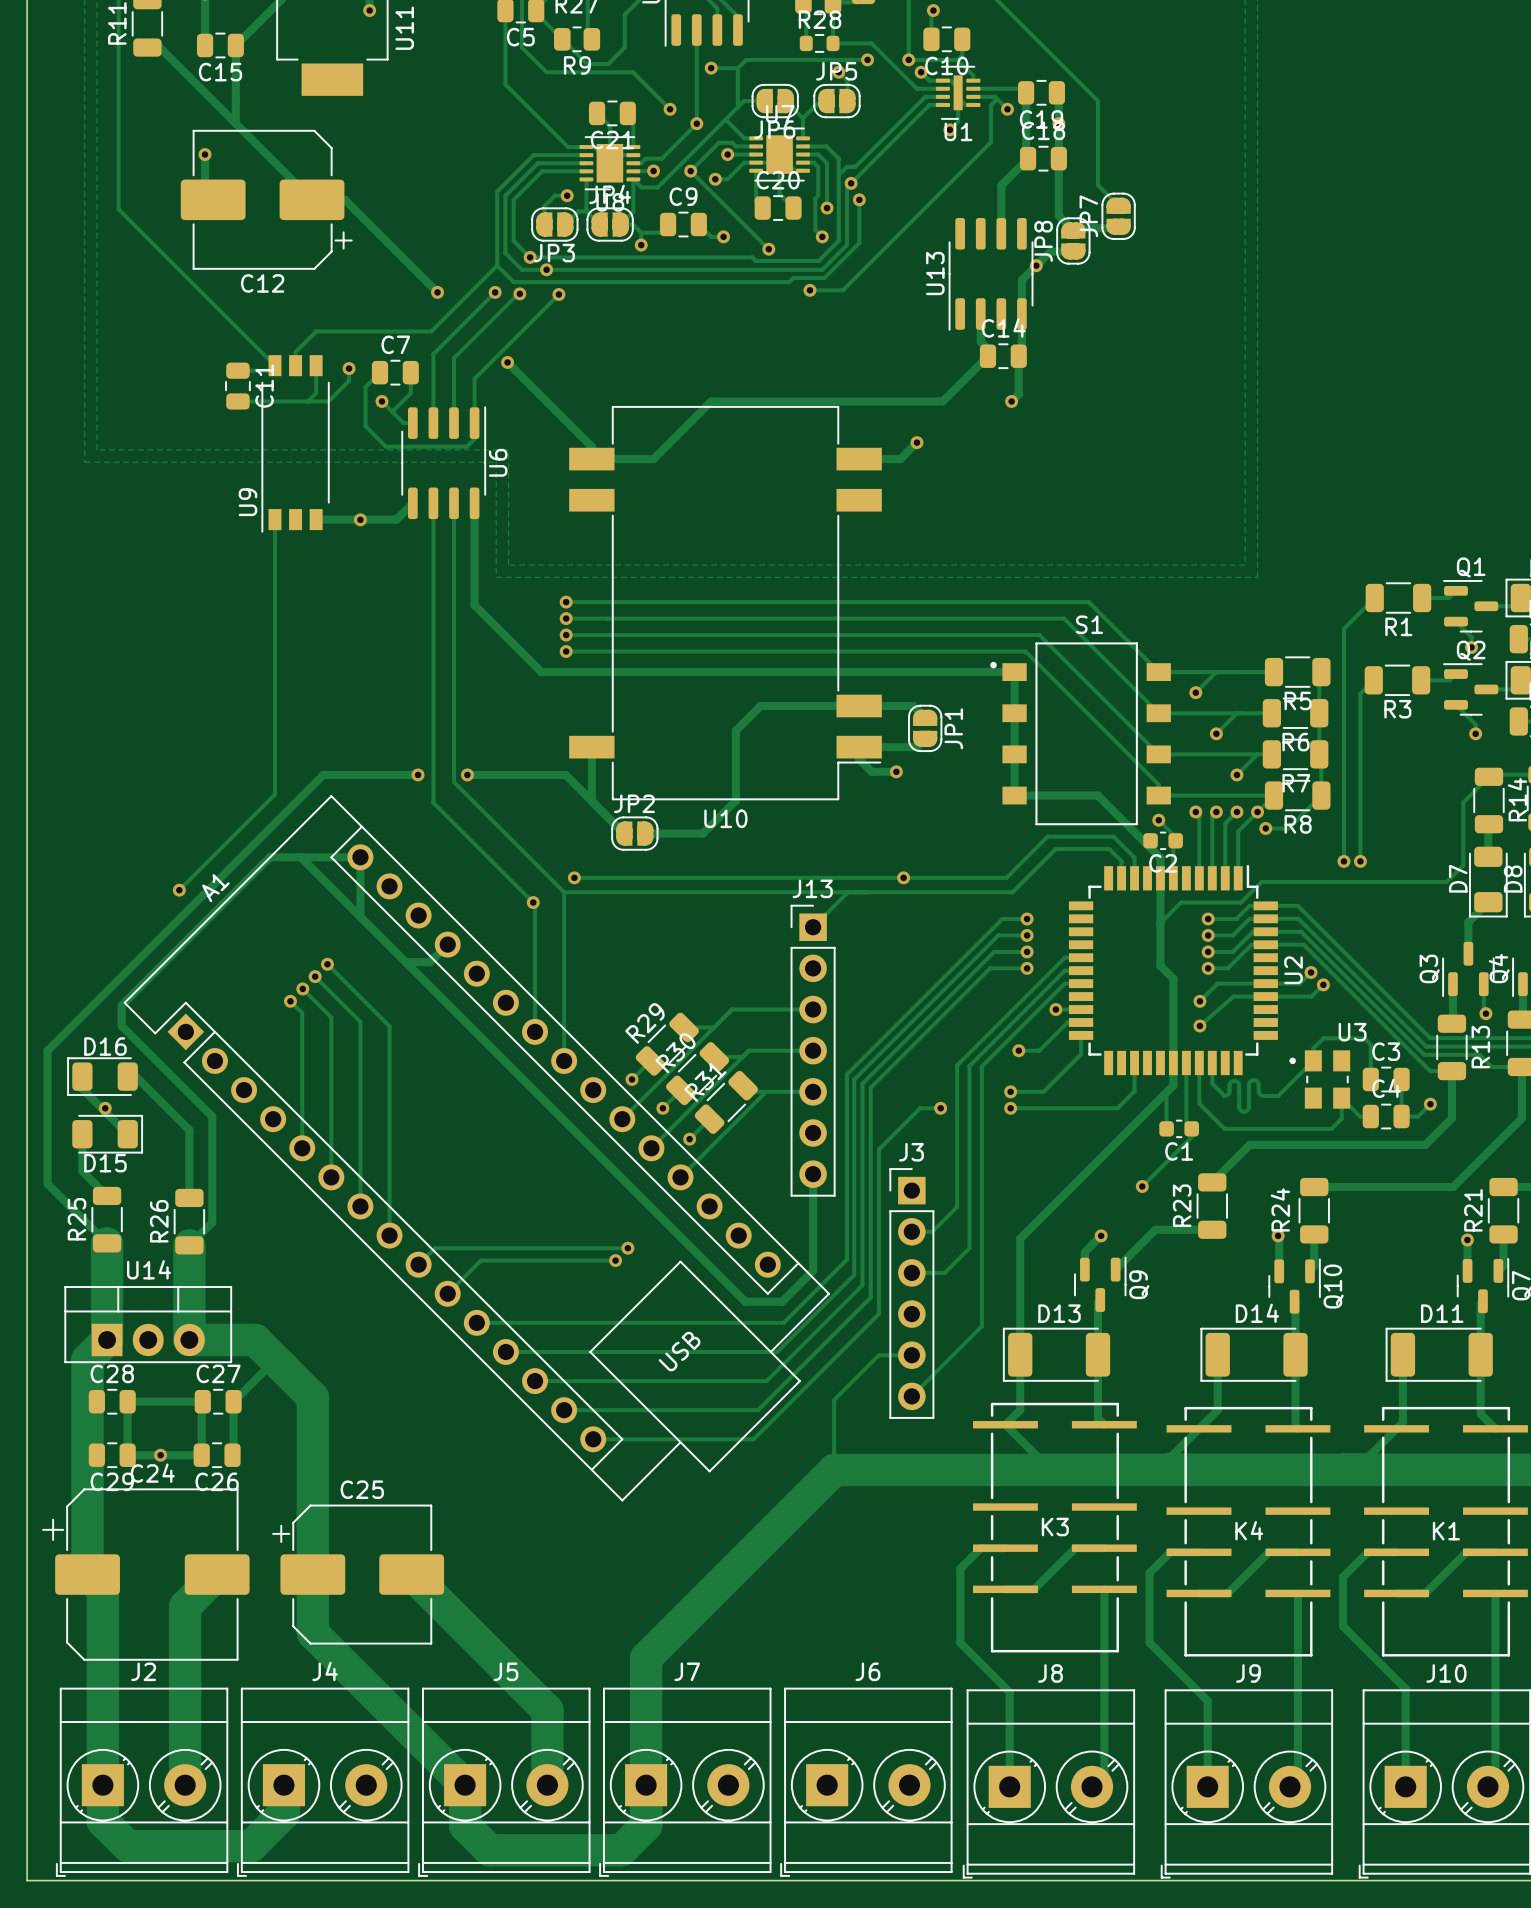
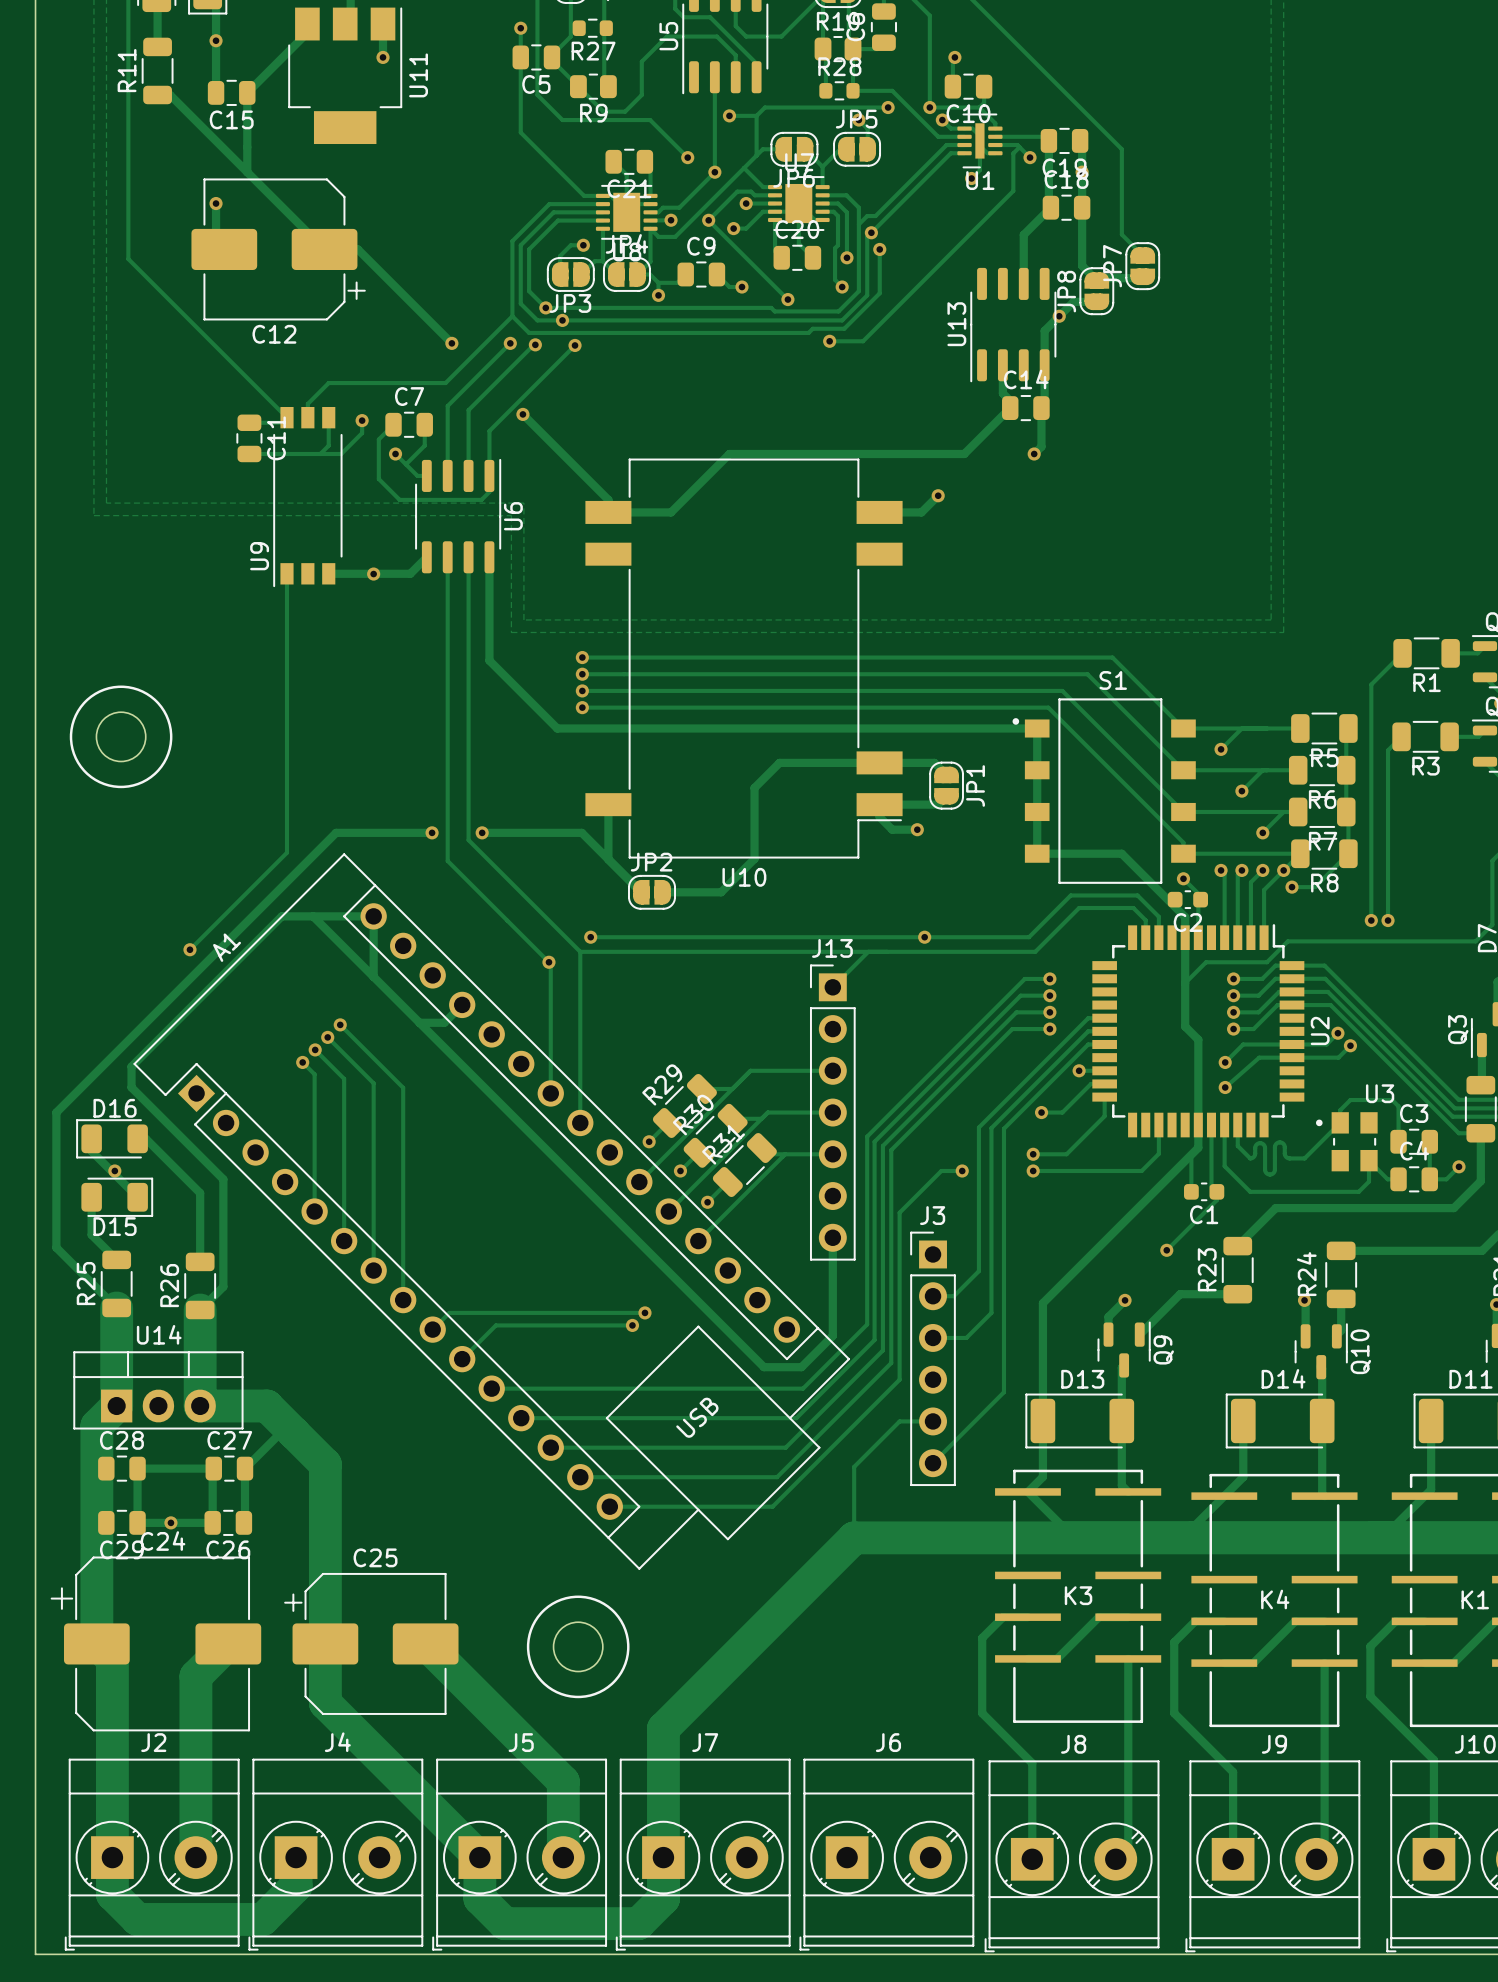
drawing: none -> [69, 685, 173, 789]
round board edge: none -> [95, 711, 147, 763]
drawing: none -> [526, 1595, 630, 1699]
round board edge: none -> [552, 1621, 604, 1673]

